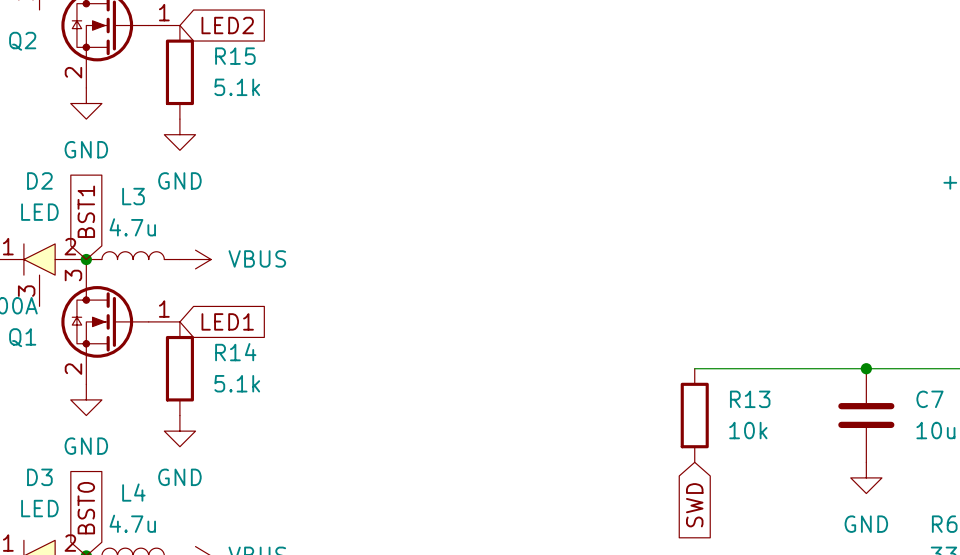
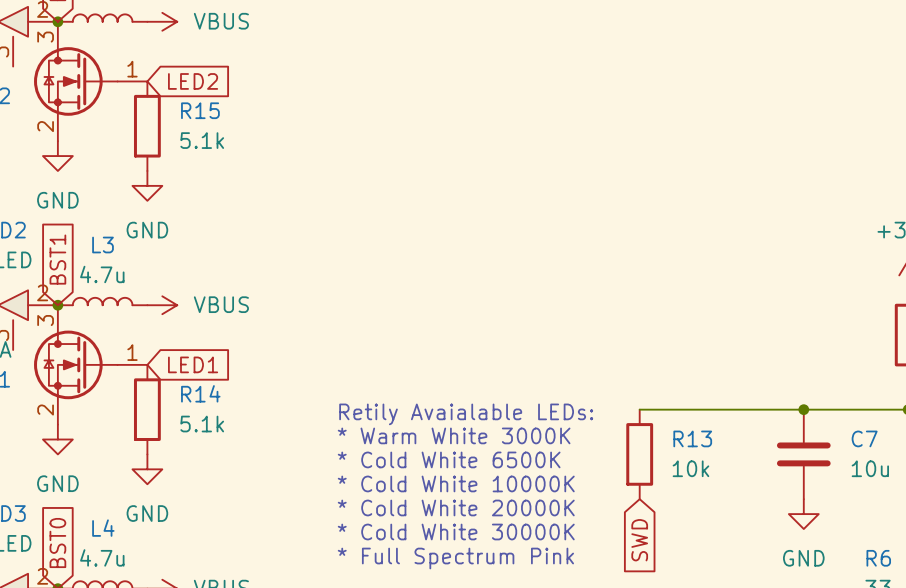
text: none -> Retily Avaialable LEDs: (466, 414)
text: none -> * Warm White 3000K (454, 435)
text: none -> * Cold White 6500K (449, 459)
text: none -> * Cold White 10000K (456, 483)
text: none -> * Cold White 20000K (456, 507)
text: none -> * Cold White 30000K (456, 532)
text: none -> * Full Spectrum Pink (455, 558)

